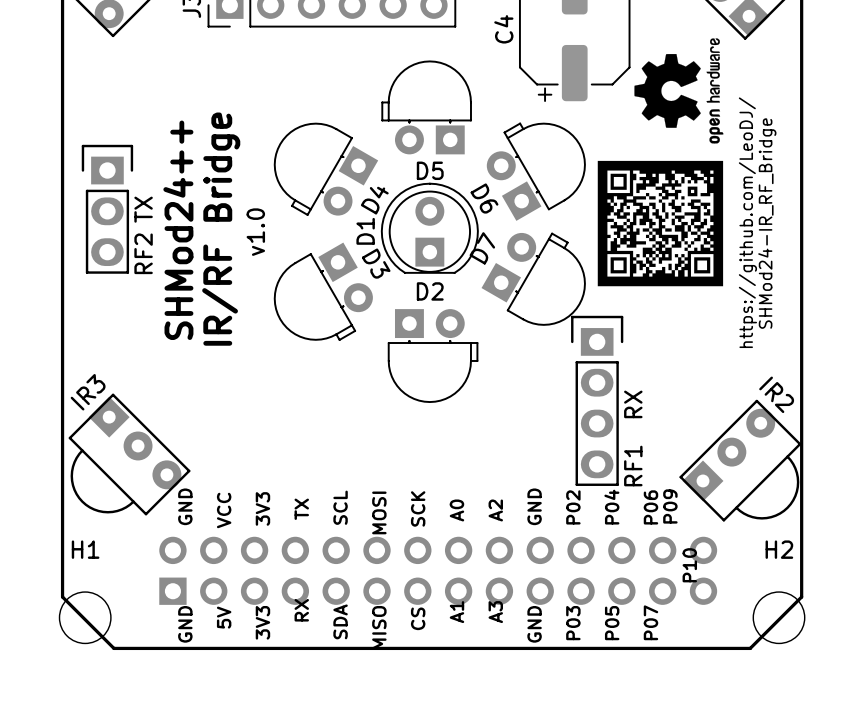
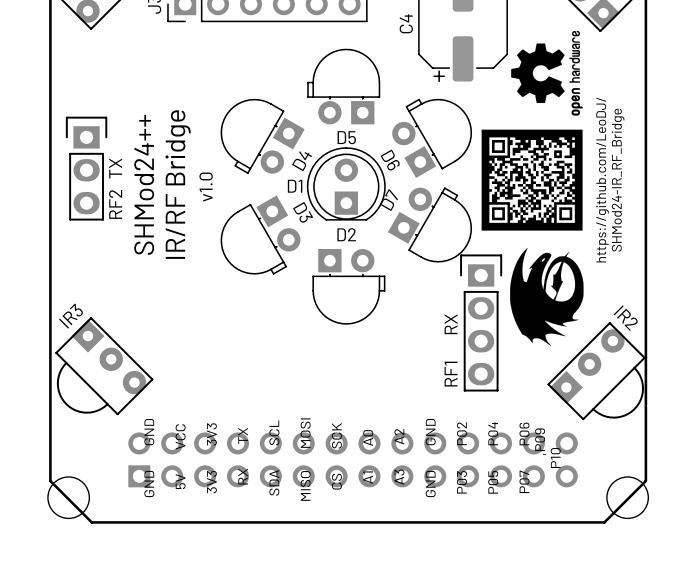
D1 name rotation: 0° (365, 231) -> 90° clockwise (295, 186)
drawing: none -> [510, 247, 584, 346]
text position: RX (633, 404) -> RX (451, 324)
RF1 name position: RF1 (633, 466) -> RF1 (451, 374)
text: P09 (670, 506) -> ,P09 (540, 441)
H1 name: H1 (85, 549) -> none
H2 name: H2 (779, 549) -> none

